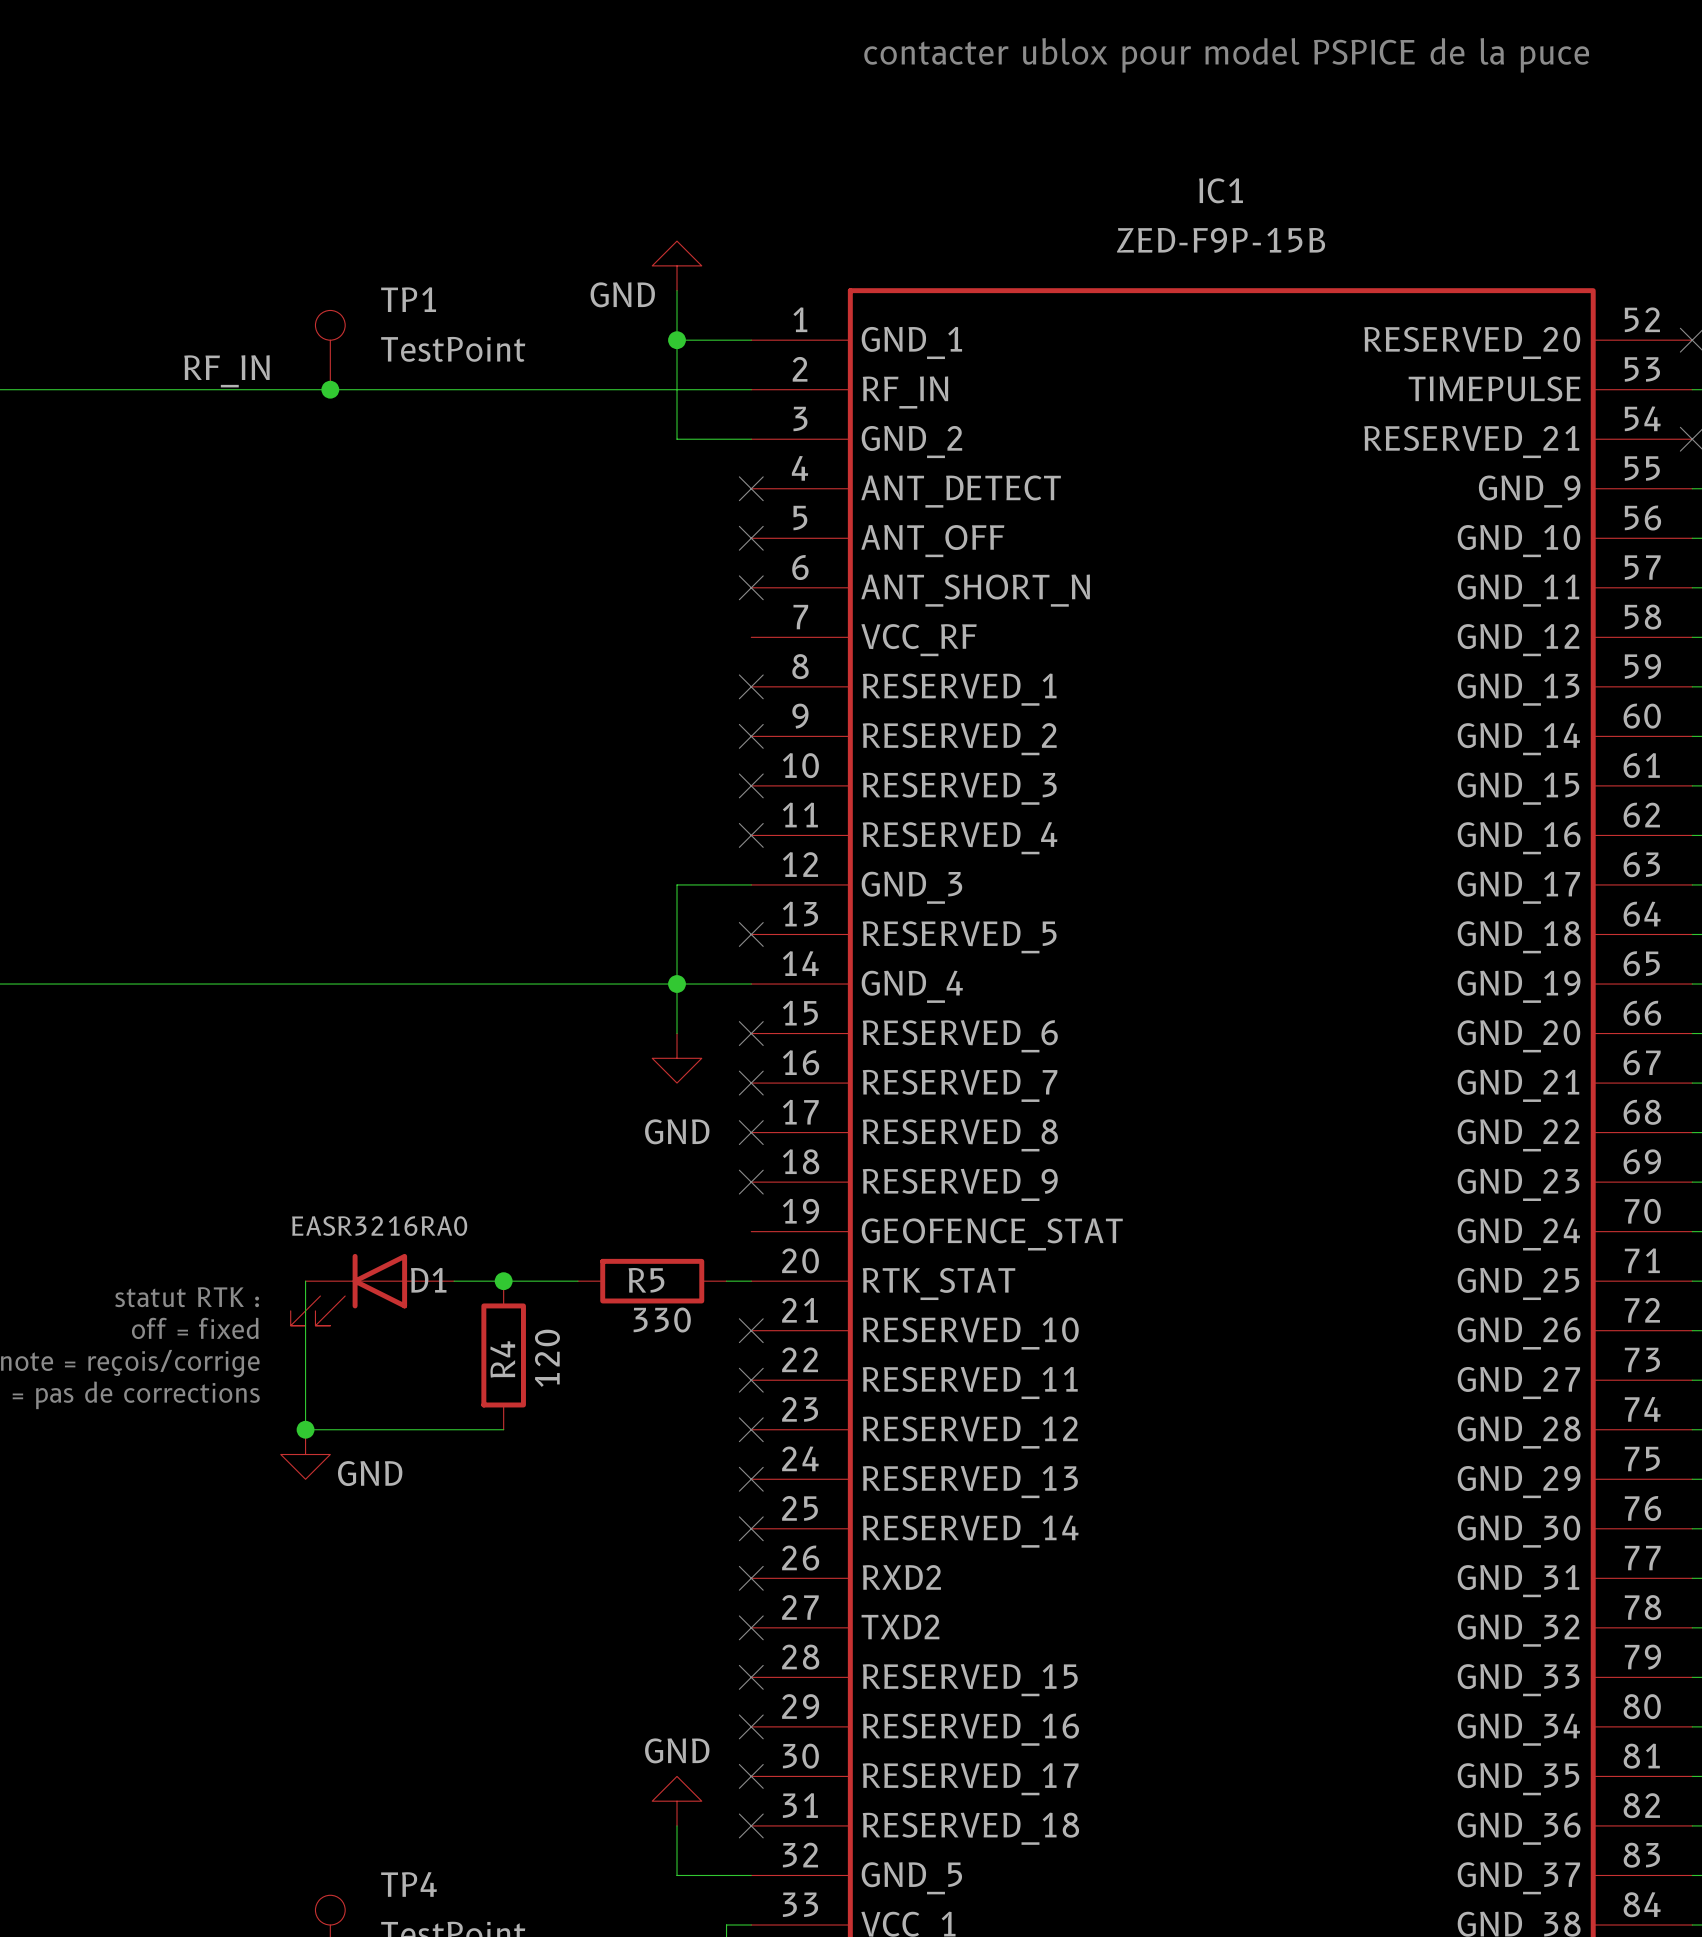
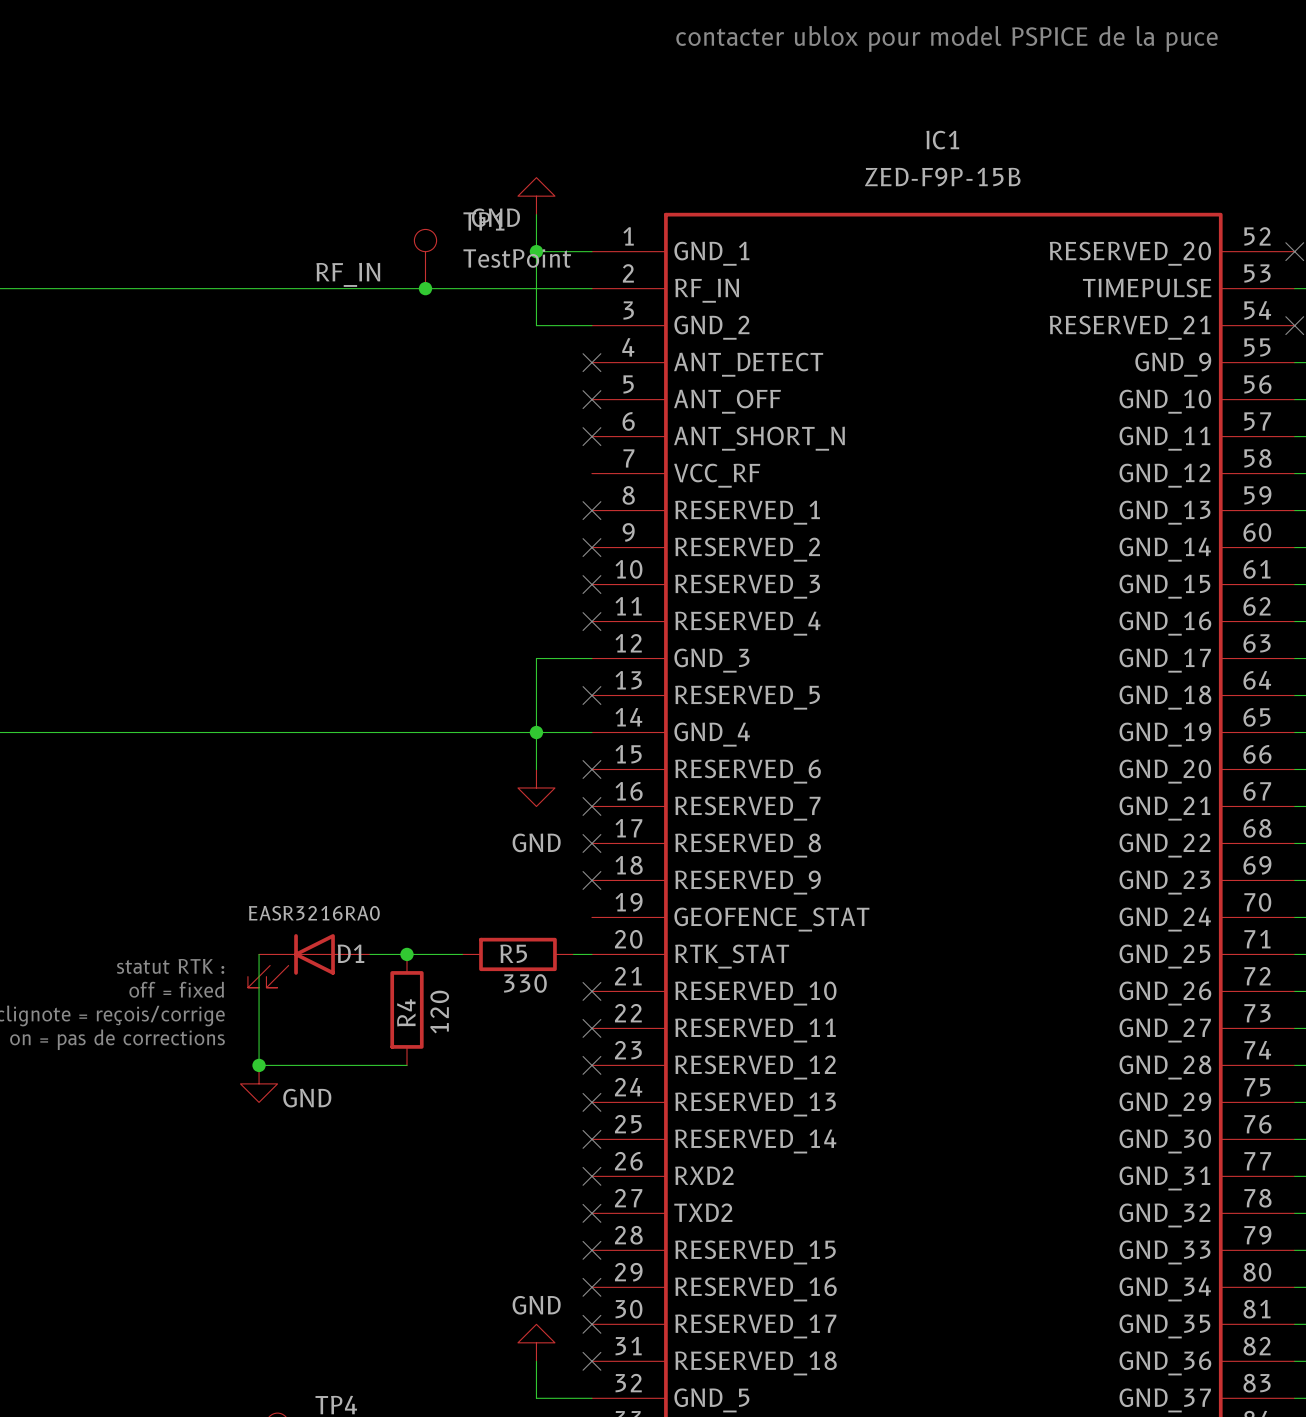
TP1 position: (330, 350) -> (425, 259)
label position: RF_IN (226, 371) -> RF_IN (348, 274)
junction: (330, 389) -> none
junction: none -> (425, 288)

